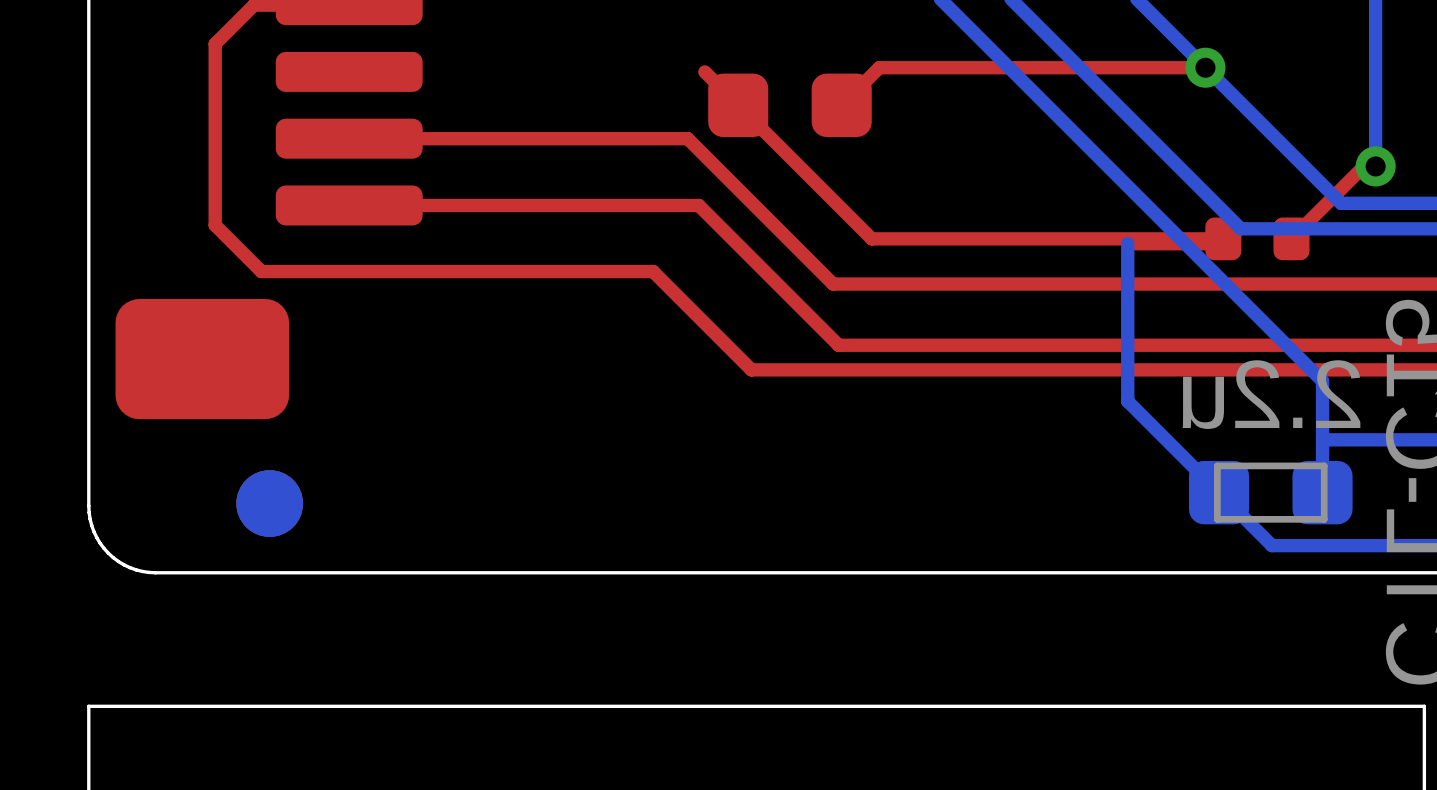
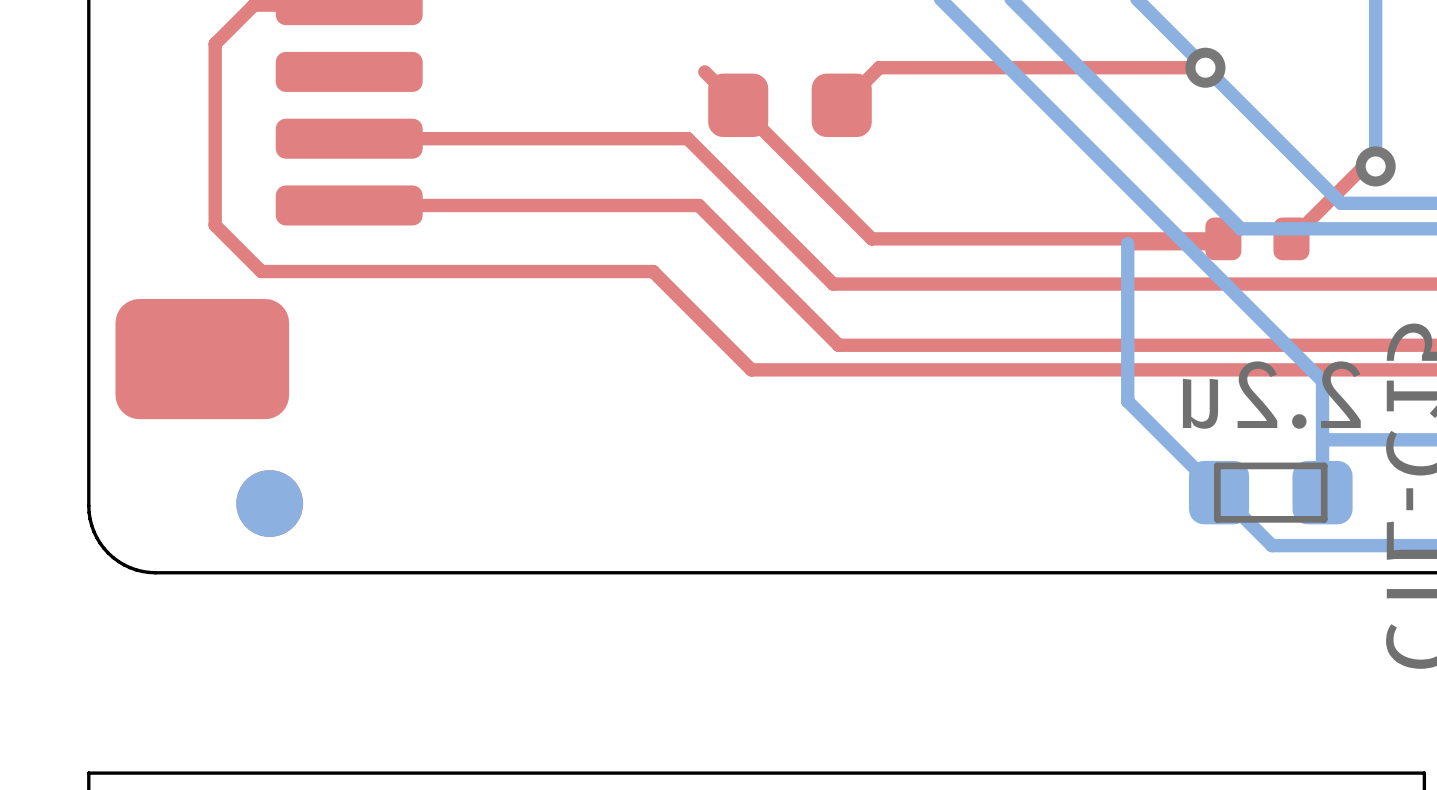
board edge: (1424, 773) (1424, 706) (88, 706) (88, 773) -> (1424, 773) (88, 773)

